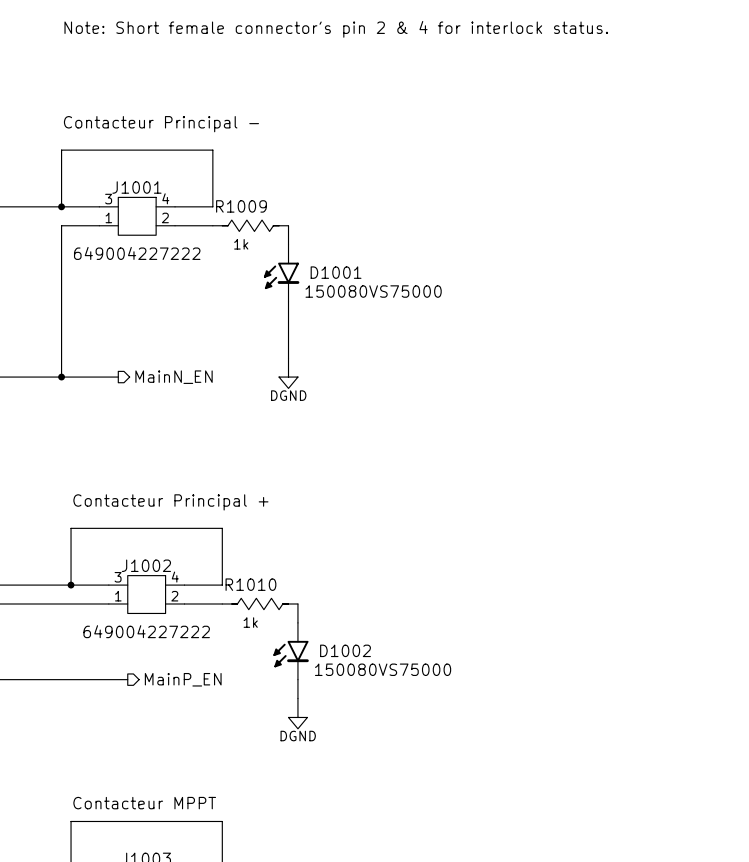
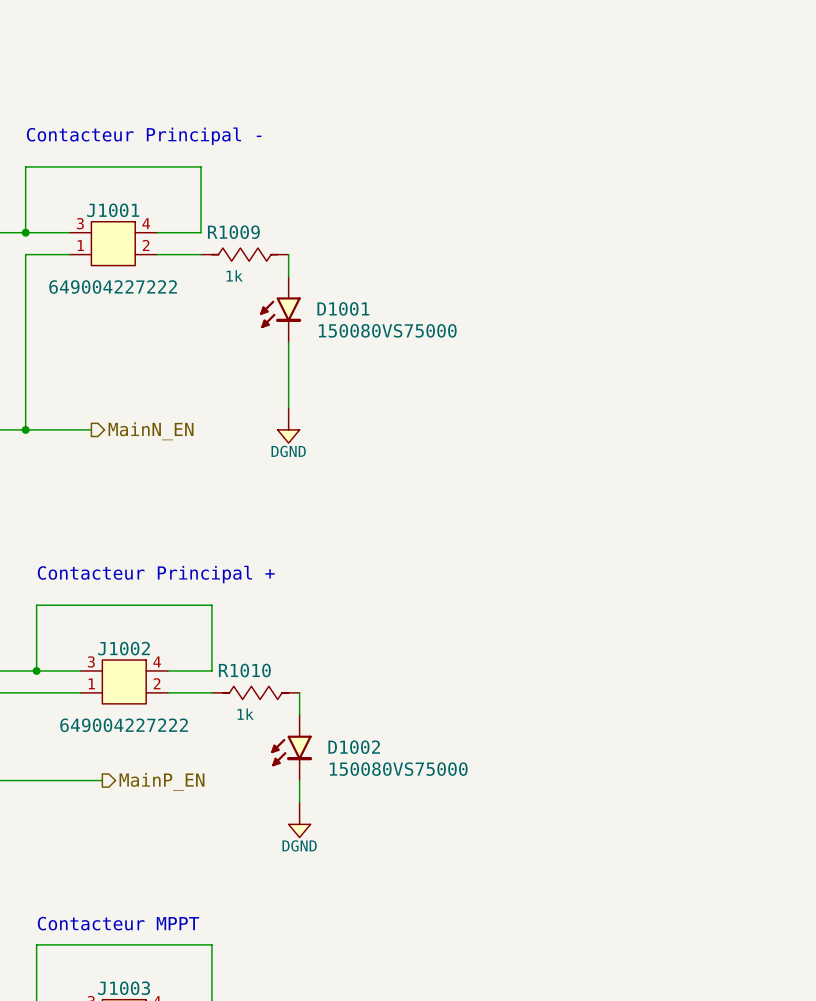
text: Note: Short female connector's pin 2 & 4 for interlock status. (336, 29) -> none

